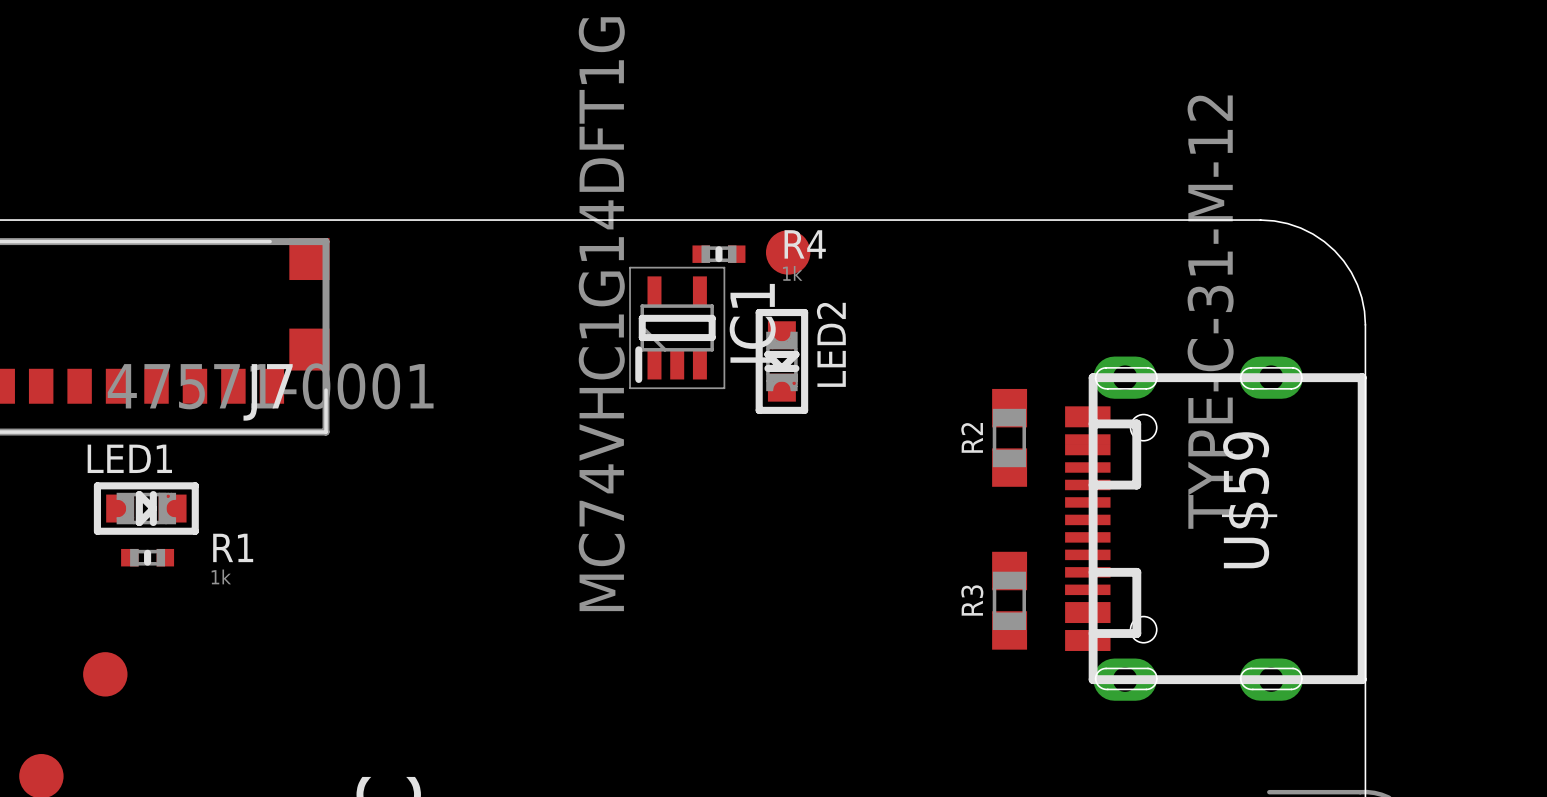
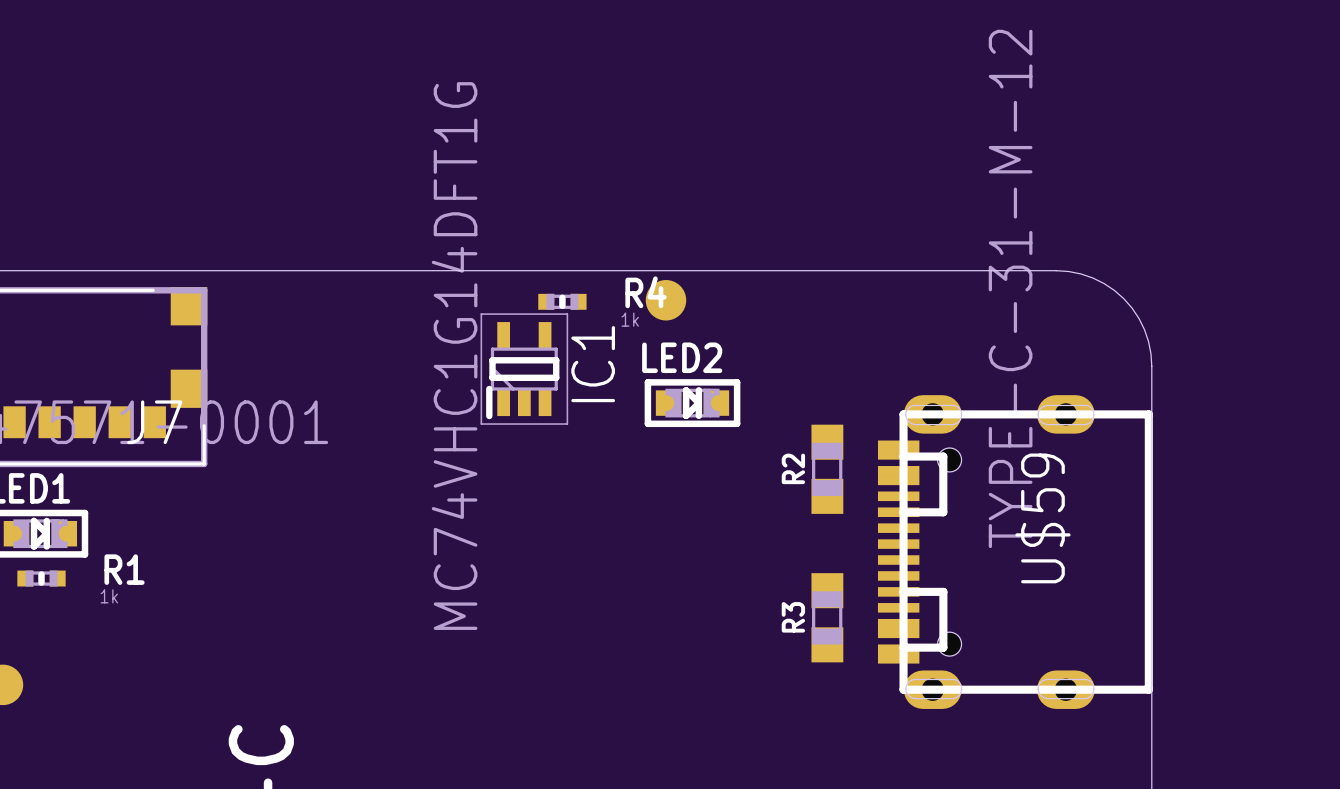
part position: (788, 252) -> (665, 300)
LED2 rotation: 0° (781, 361) -> 90° counterclockwise (692, 403)
LED2 position: (781, 361) -> (692, 403)

